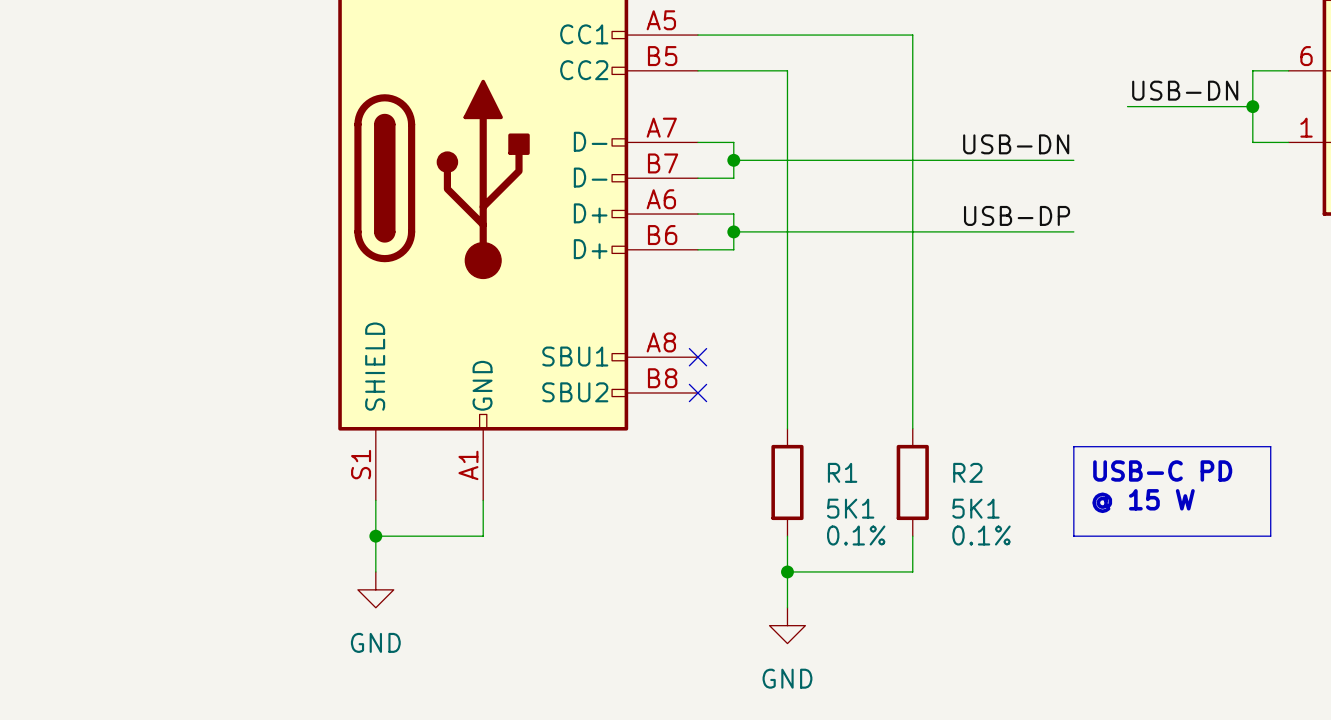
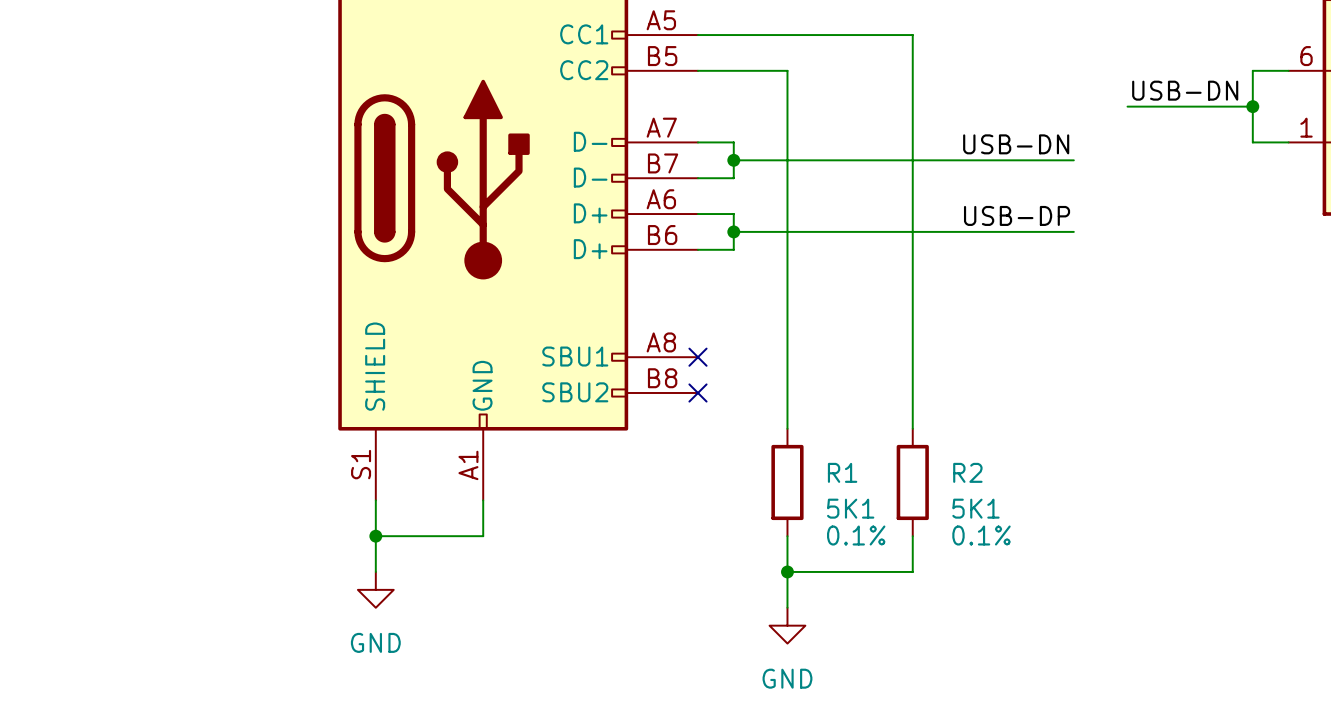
line: (1073, 446) (1270, 446) (1270, 536) (1073, 536) (1073, 446) -> none
text: USB-C PD (1162, 470) -> none
text: @ 15 W (1143, 501) -> none

